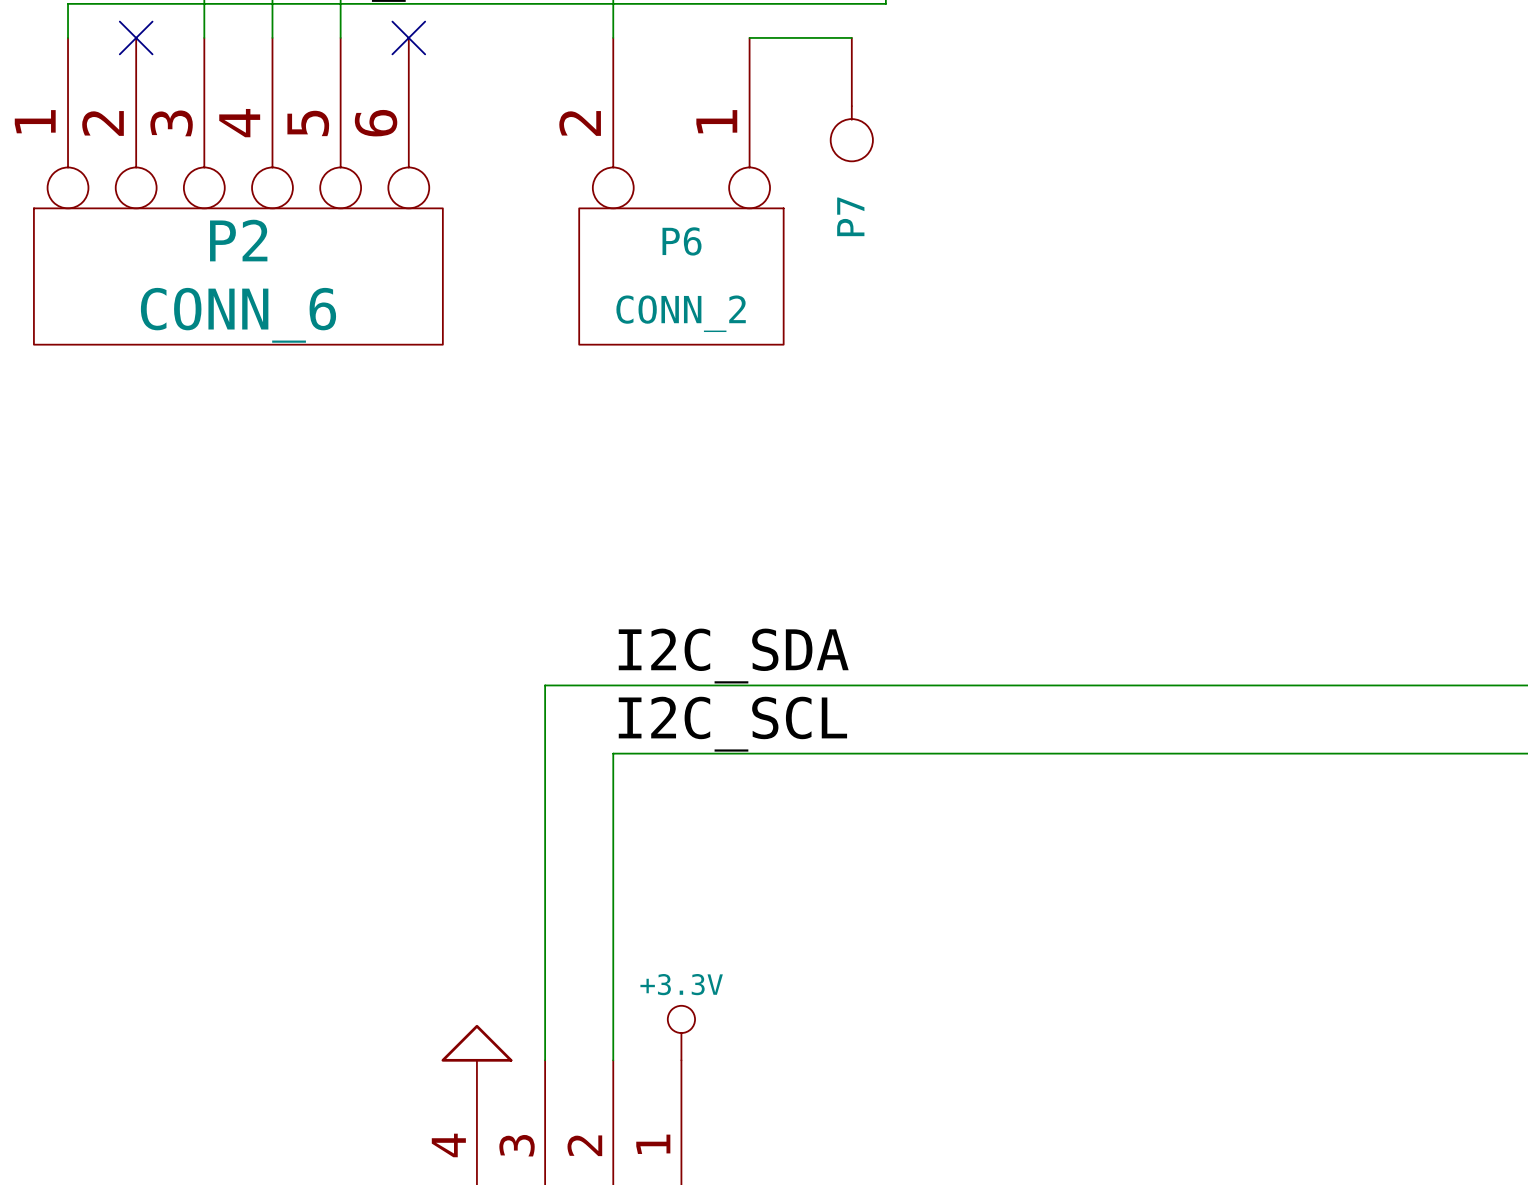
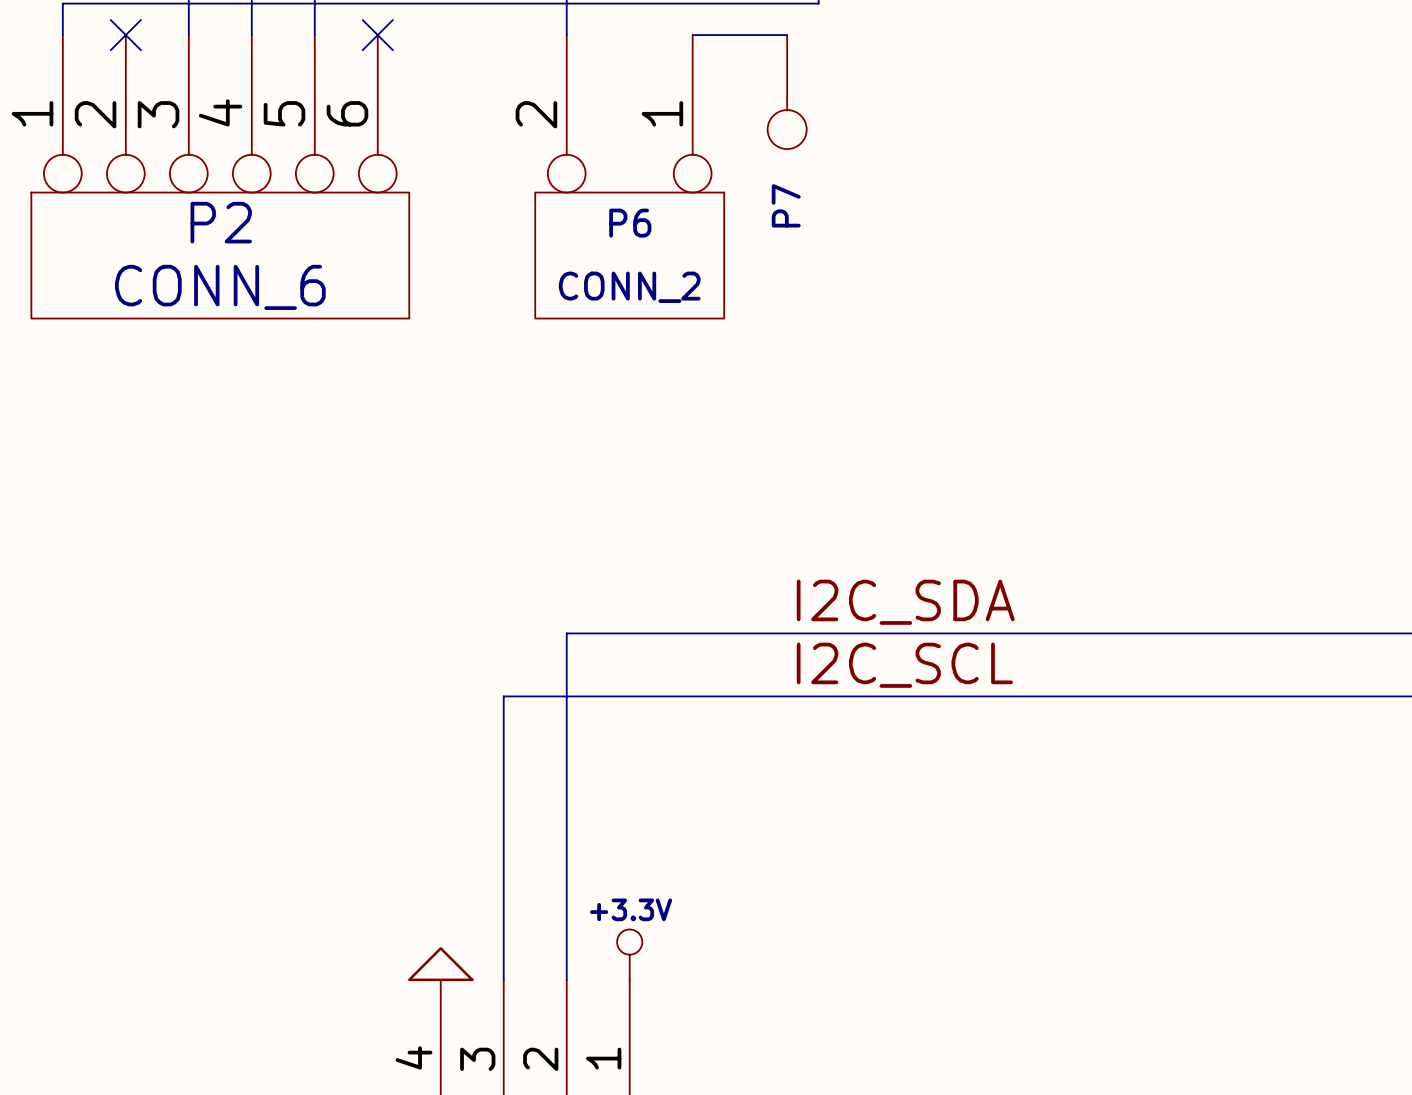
label position: I2C_SDA (733, 656) -> I2C_SDA (905, 602)
wire: (613, 685) (545, 685) (545, 753) -> (566, 633) (566, 696) (503, 696)
label position: I2C_SCL (732, 724) -> I2C_SCL (904, 665)

